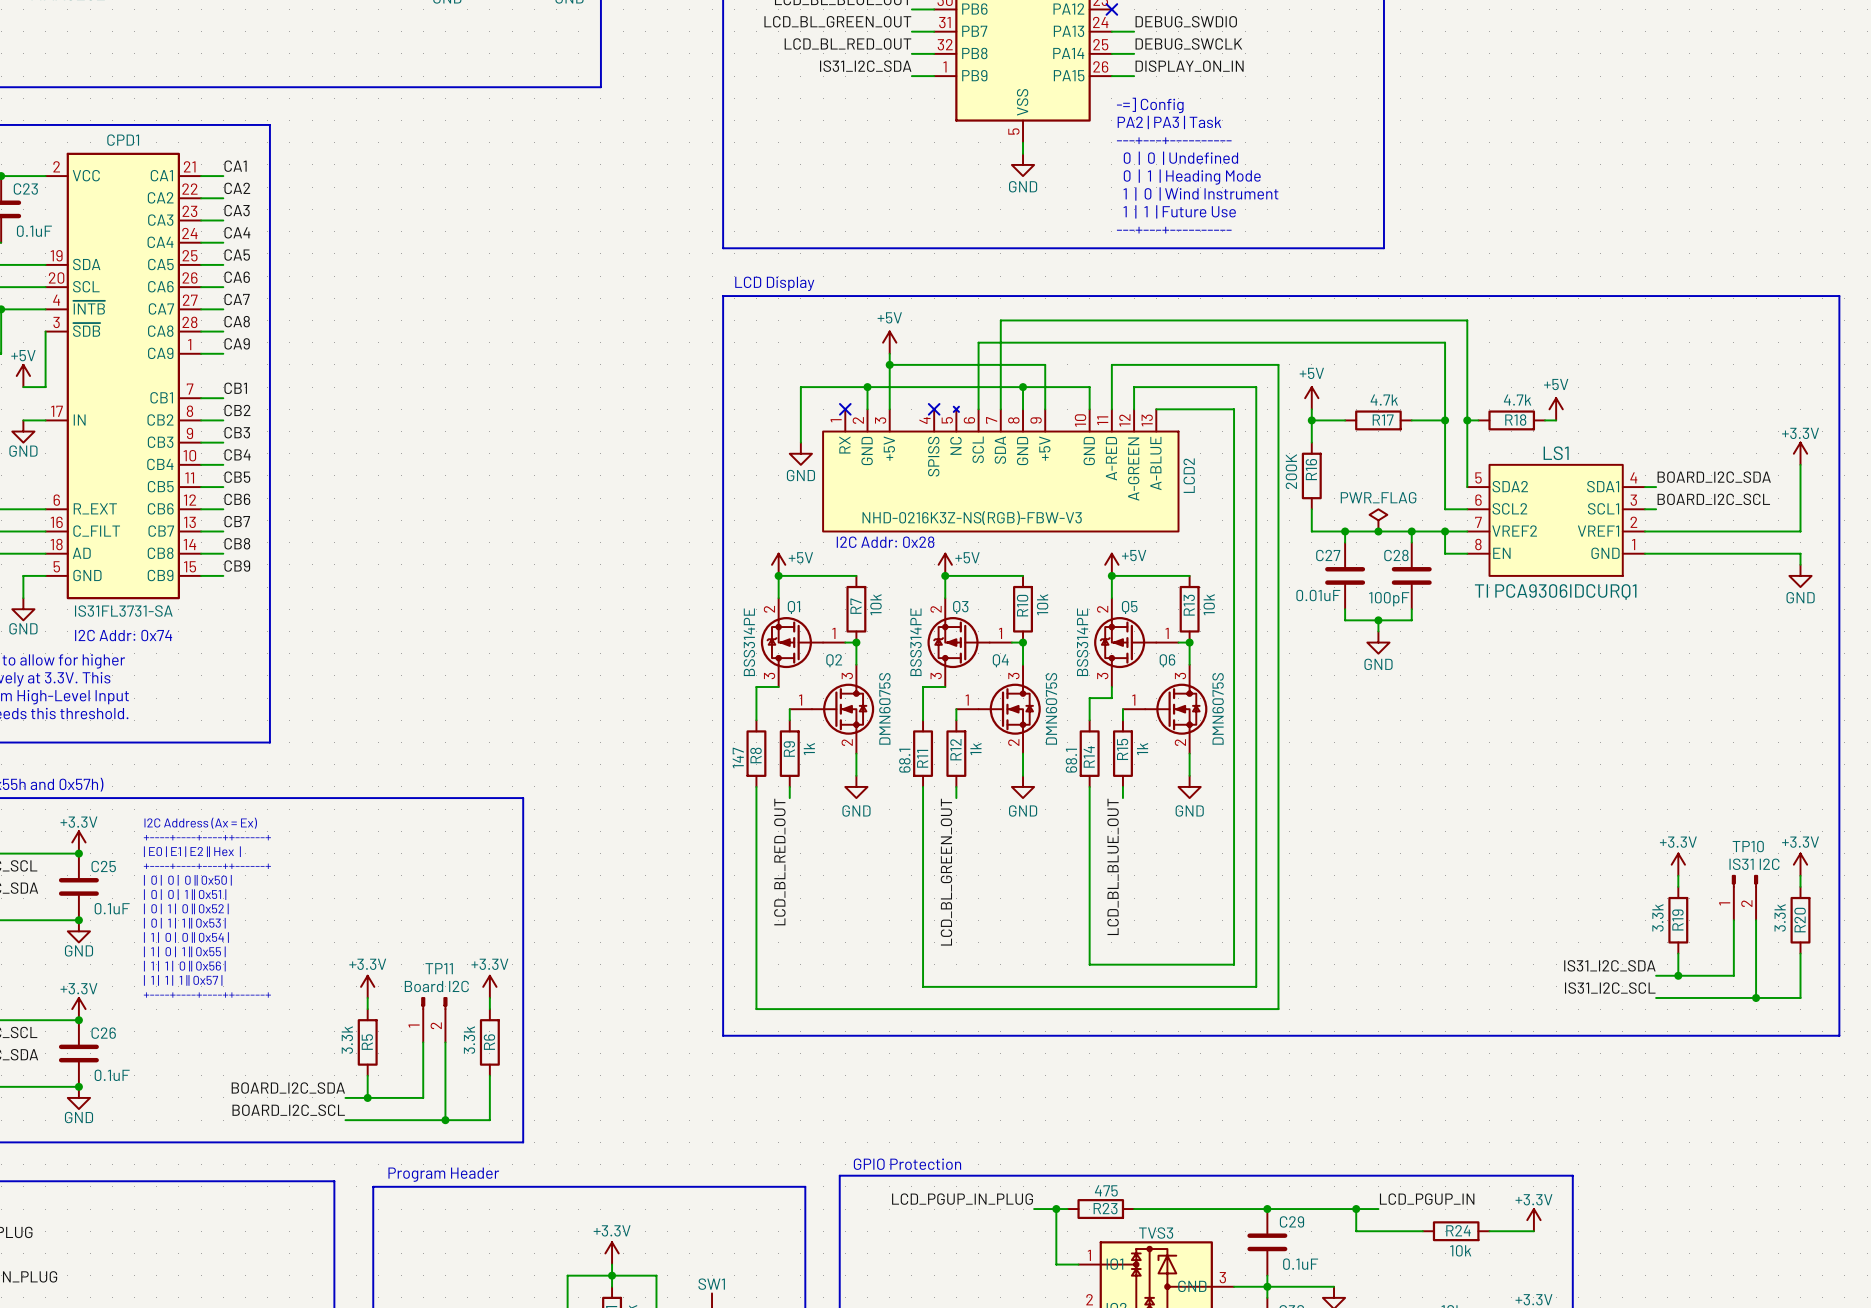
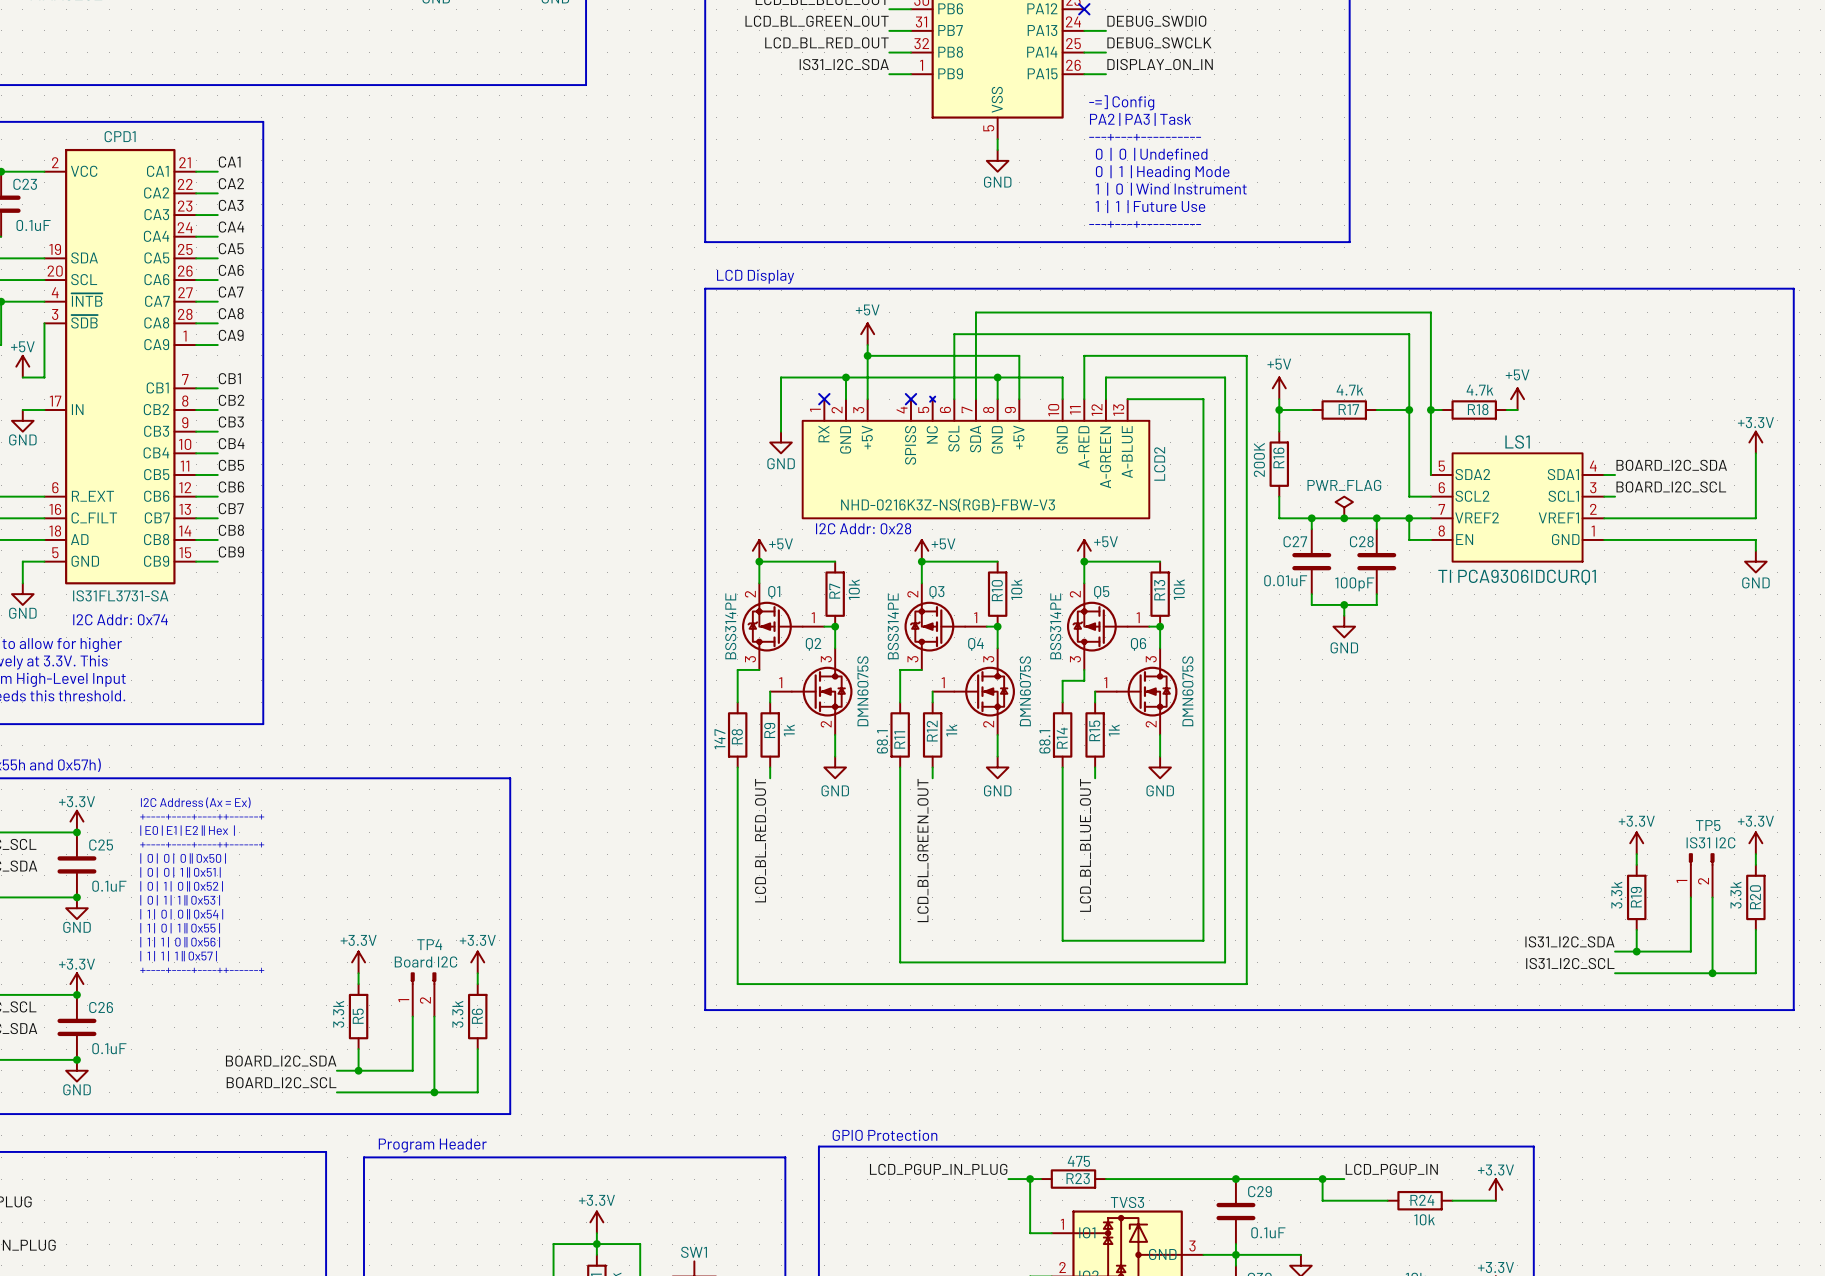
TP10 name: TP10 (1748, 846) -> TP5 (1708, 825)
TP11 name: TP11 (439, 968) -> TP4 (429, 944)

